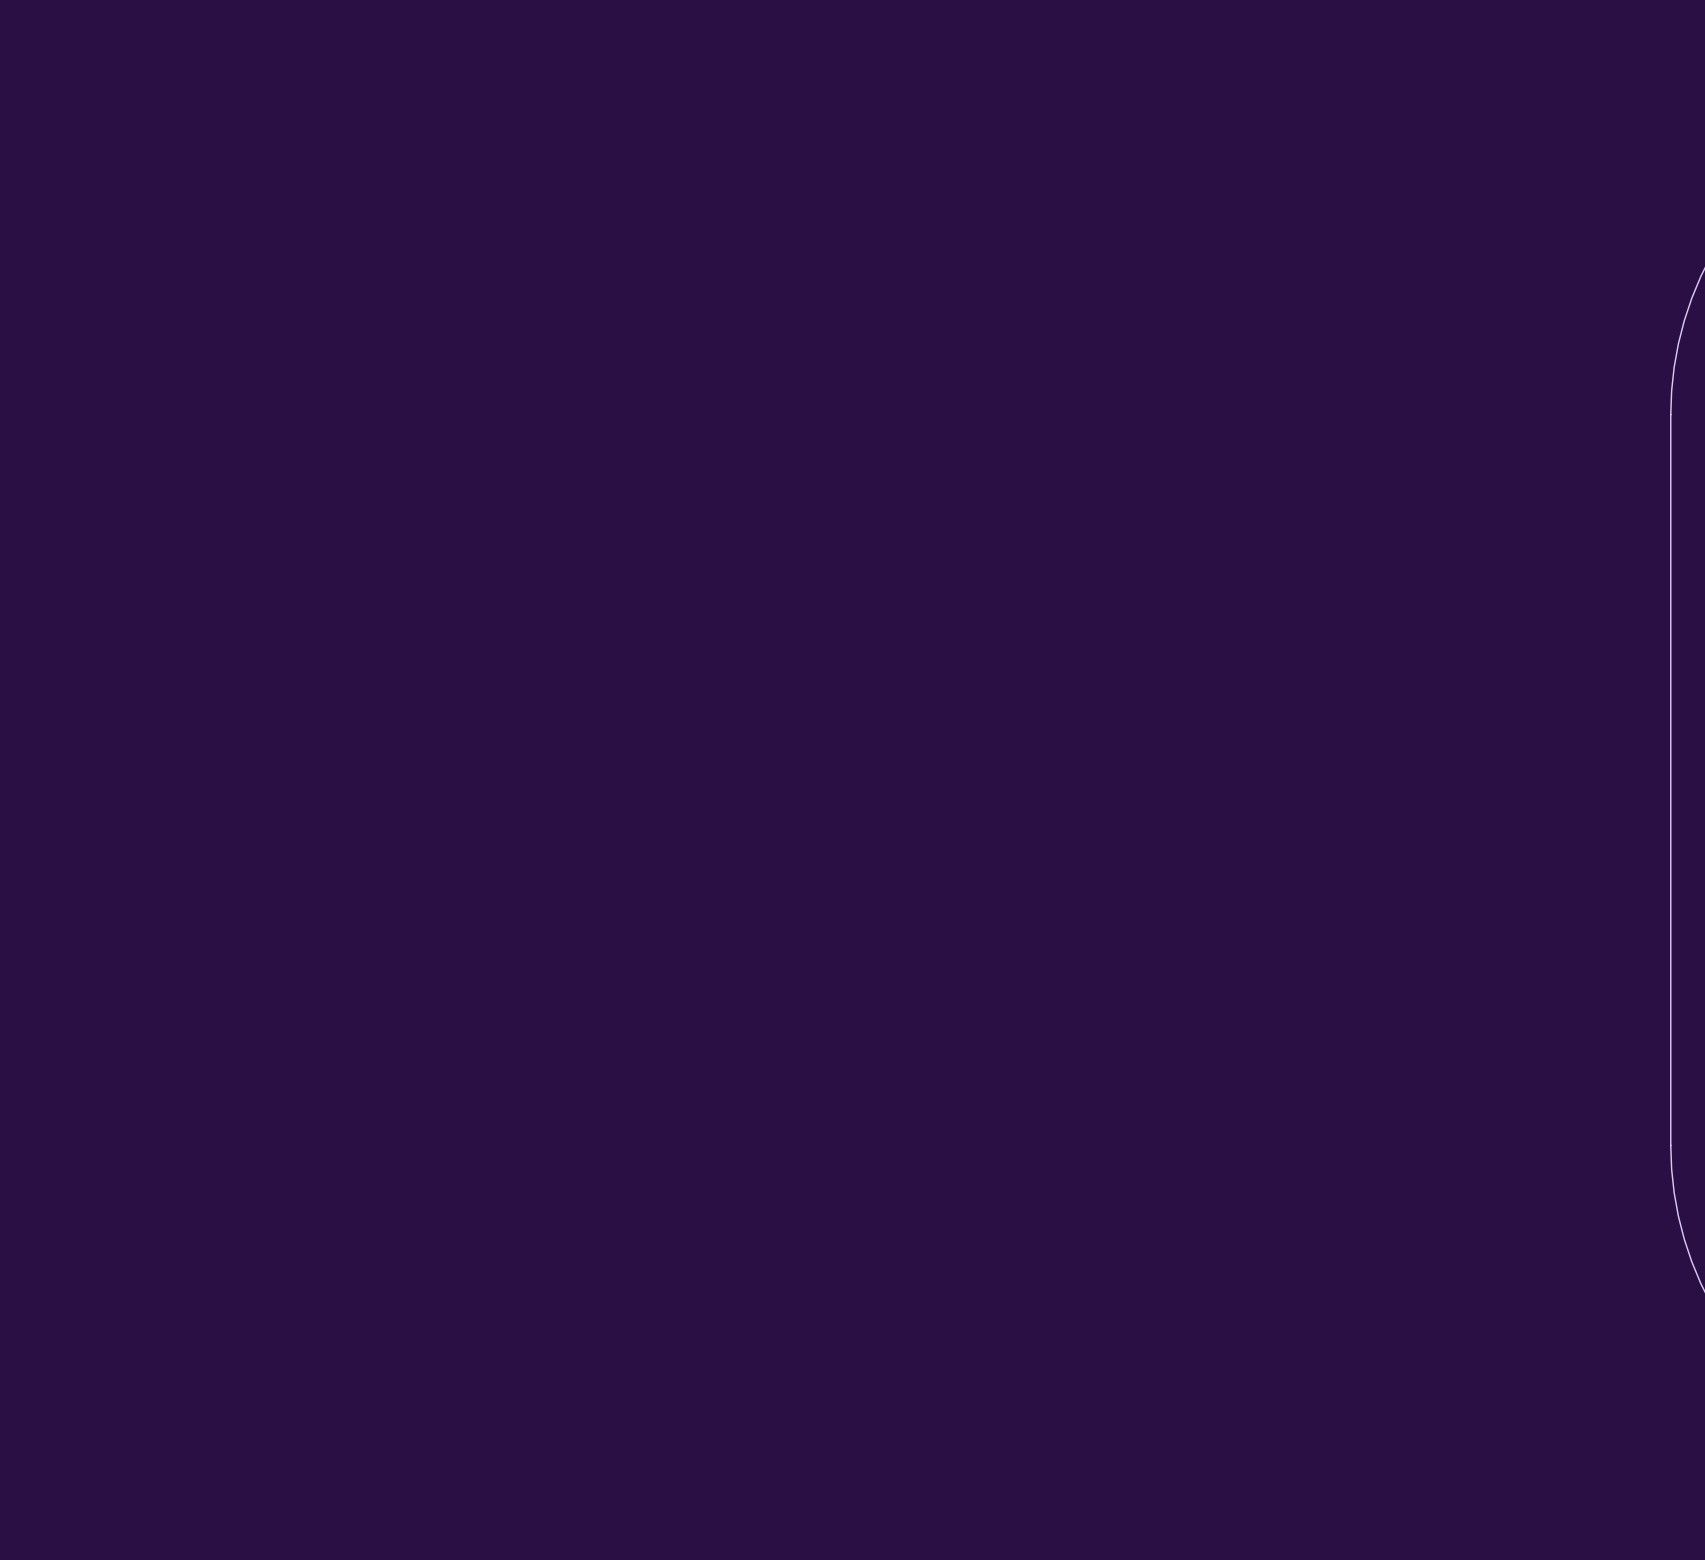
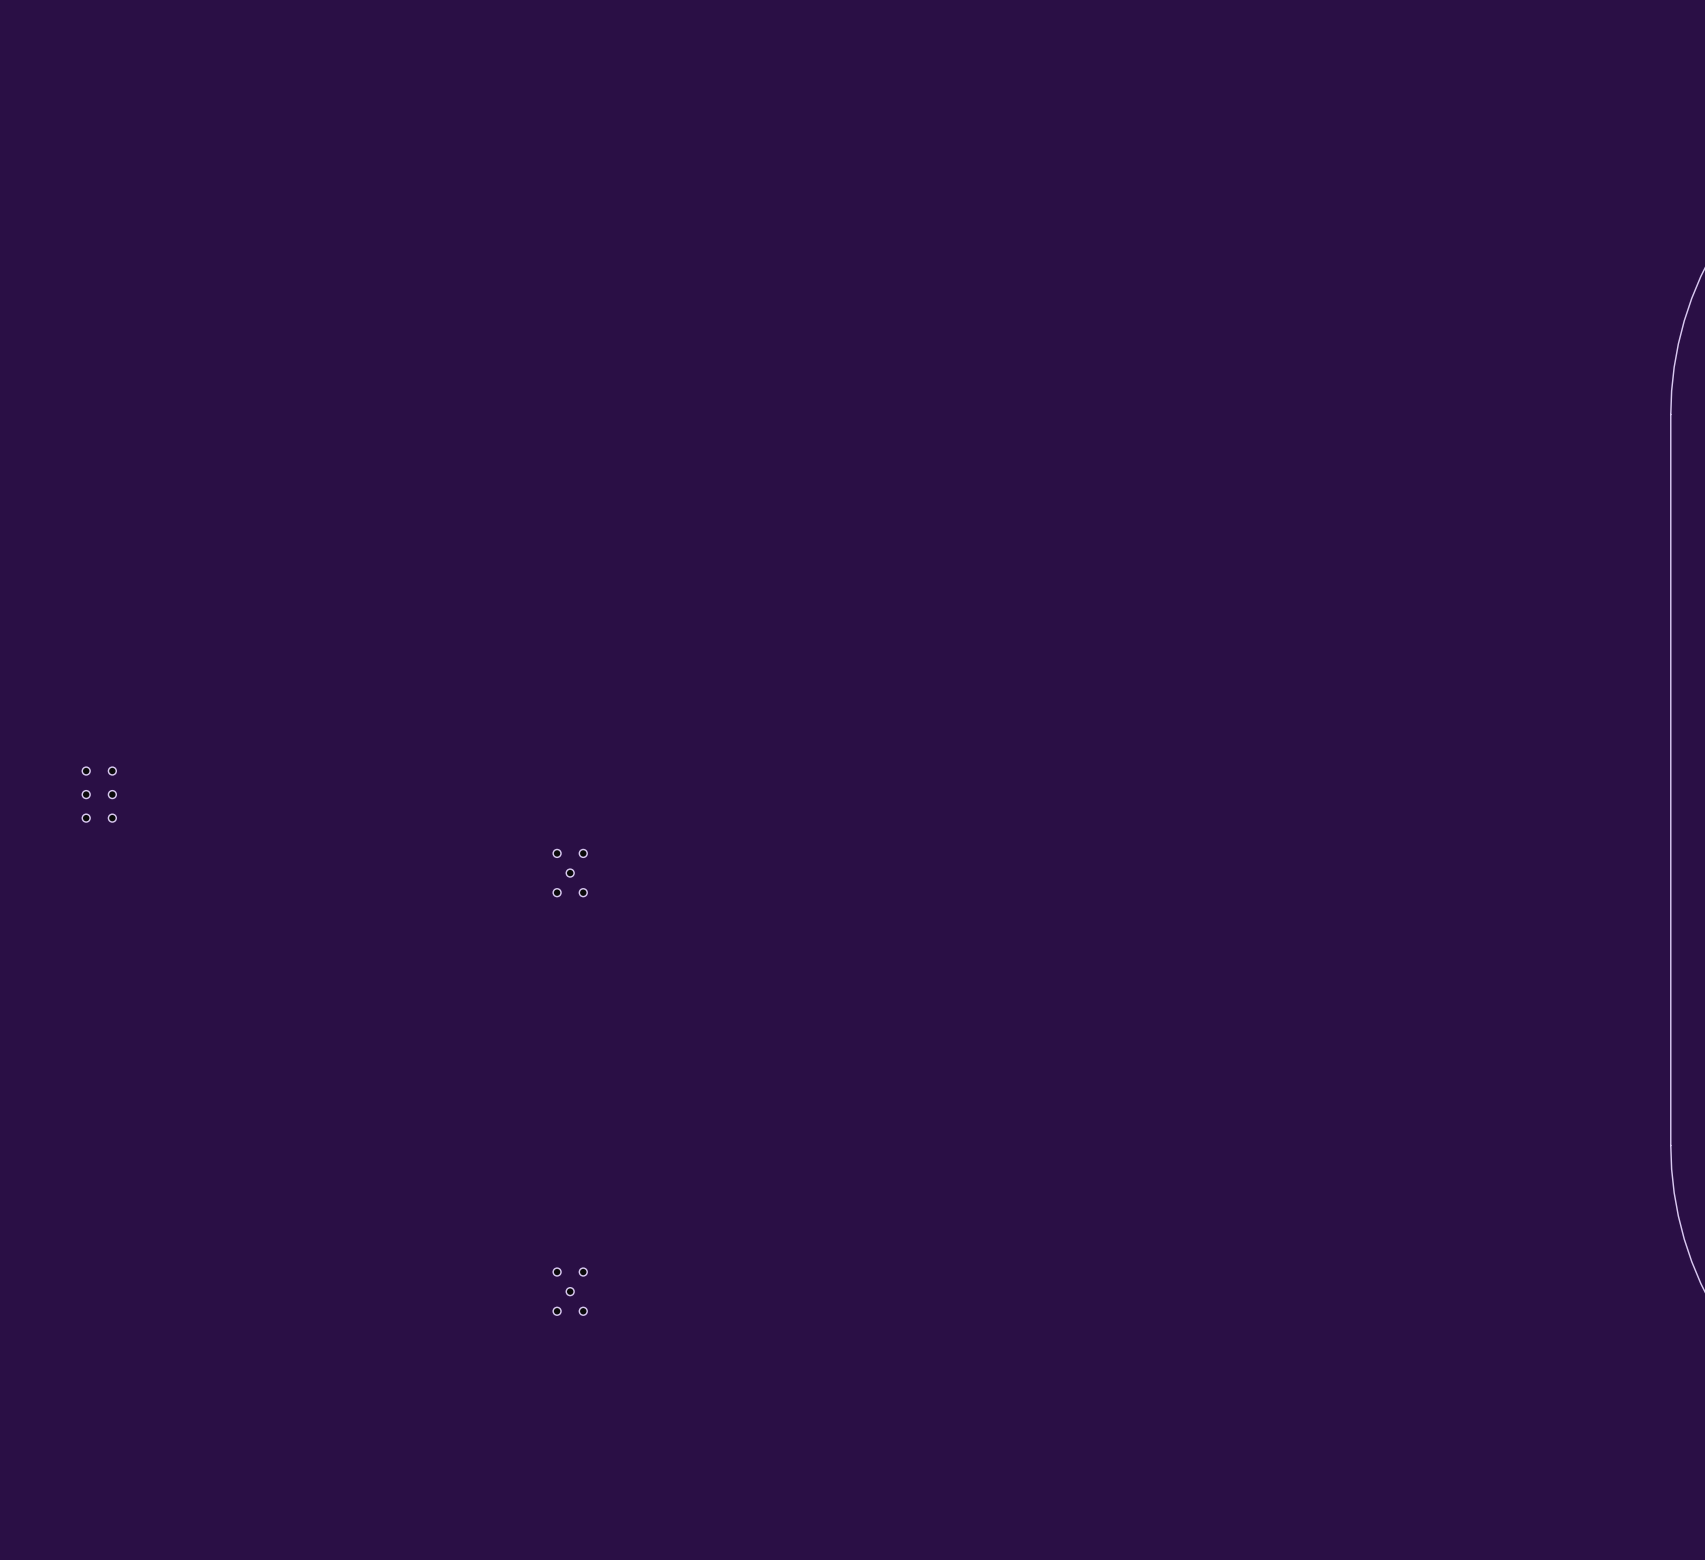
part: none -> (99, 794)
part: none -> (570, 873)
part: none -> (570, 1291)

